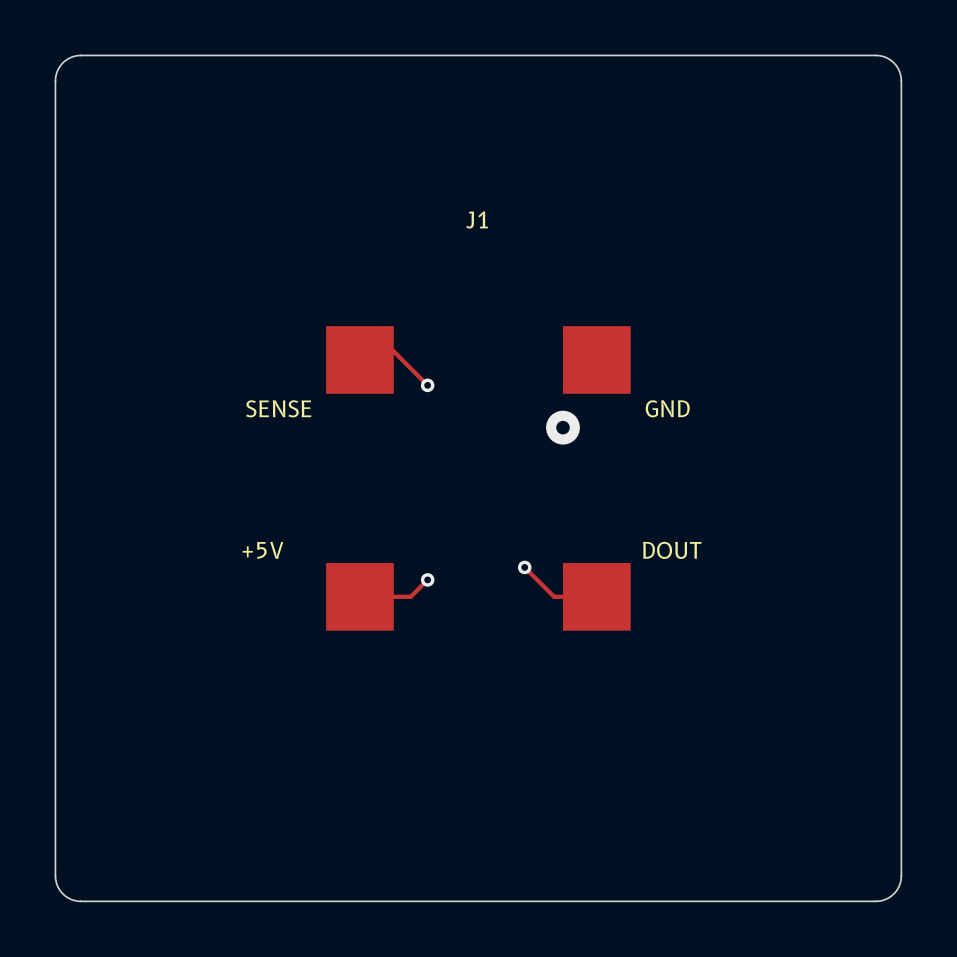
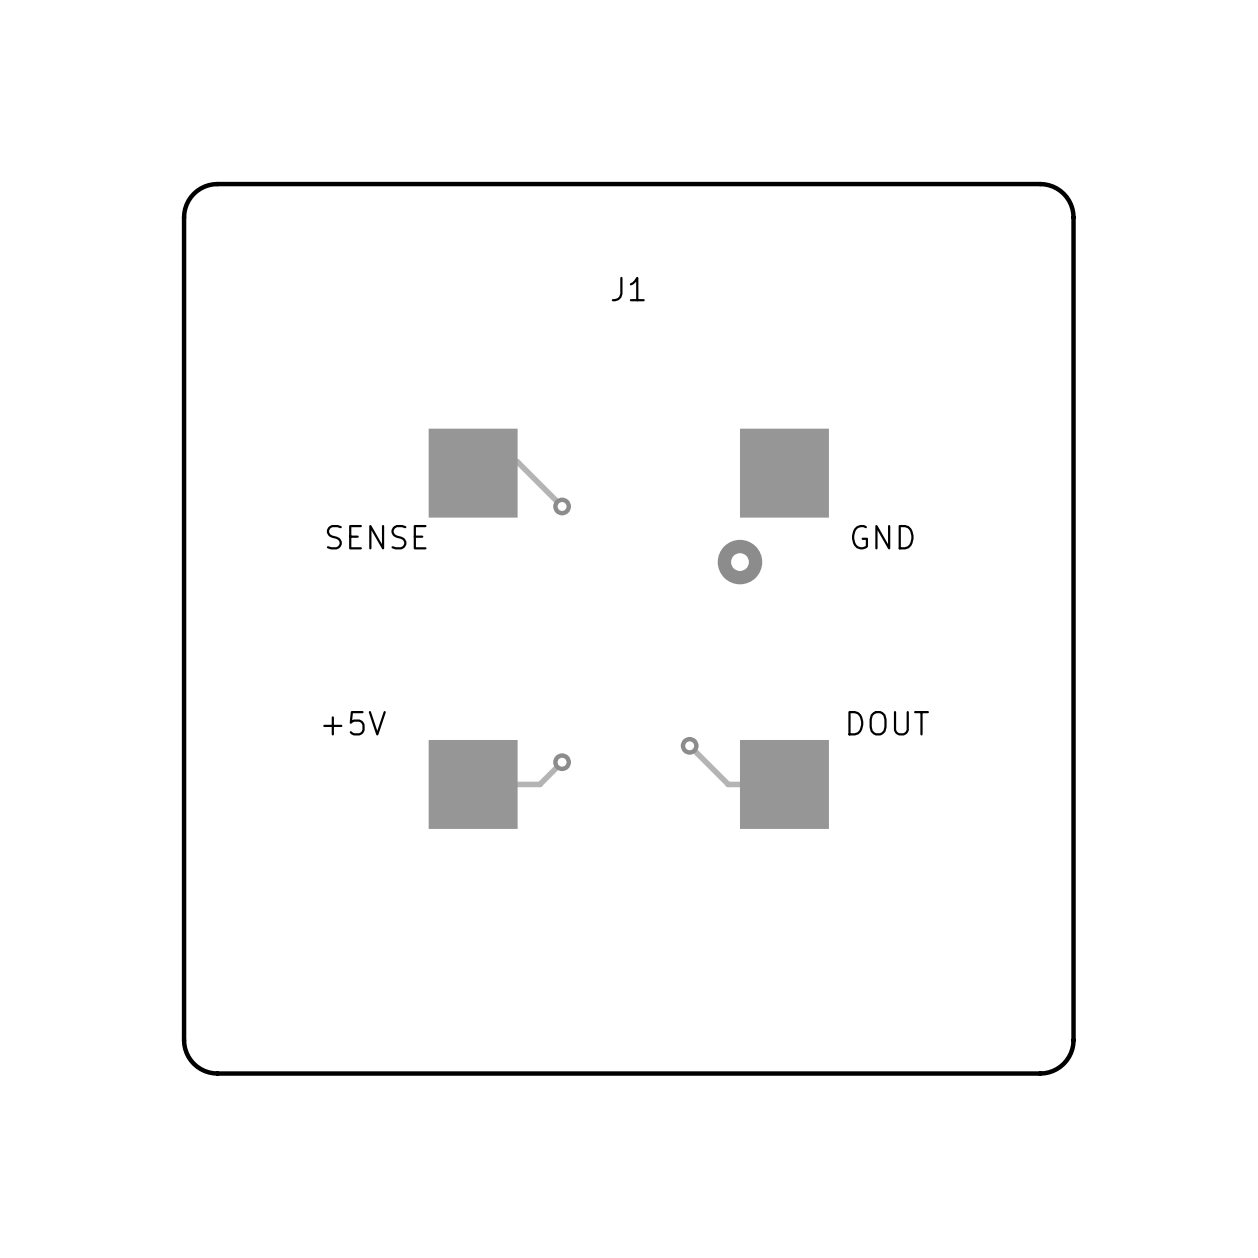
board edge: (80, 55) (875, 55) (885, 57) (893, 62) (899, 71) (901, 80) (901, 875) (899, 885) (893, 893) (885, 899) (875, 901) (80, 901) (71, 899) (62, 893) (57, 885) (55, 875) (55, 80) (57, 71) (62, 62) (71, 57) (80, 55) -> (217, 184) (204, 186) (193, 193) (186, 204) (184, 217) (184, 1040) (186, 1052) (193, 1063) (204, 1070) (217, 1073) (1040, 1073) (1052, 1070) (1063, 1063) (1070, 1052) (1073, 1040) (1073, 217) (1070, 204) (1063, 193) (1052, 186) (1040, 184) (217, 184)

